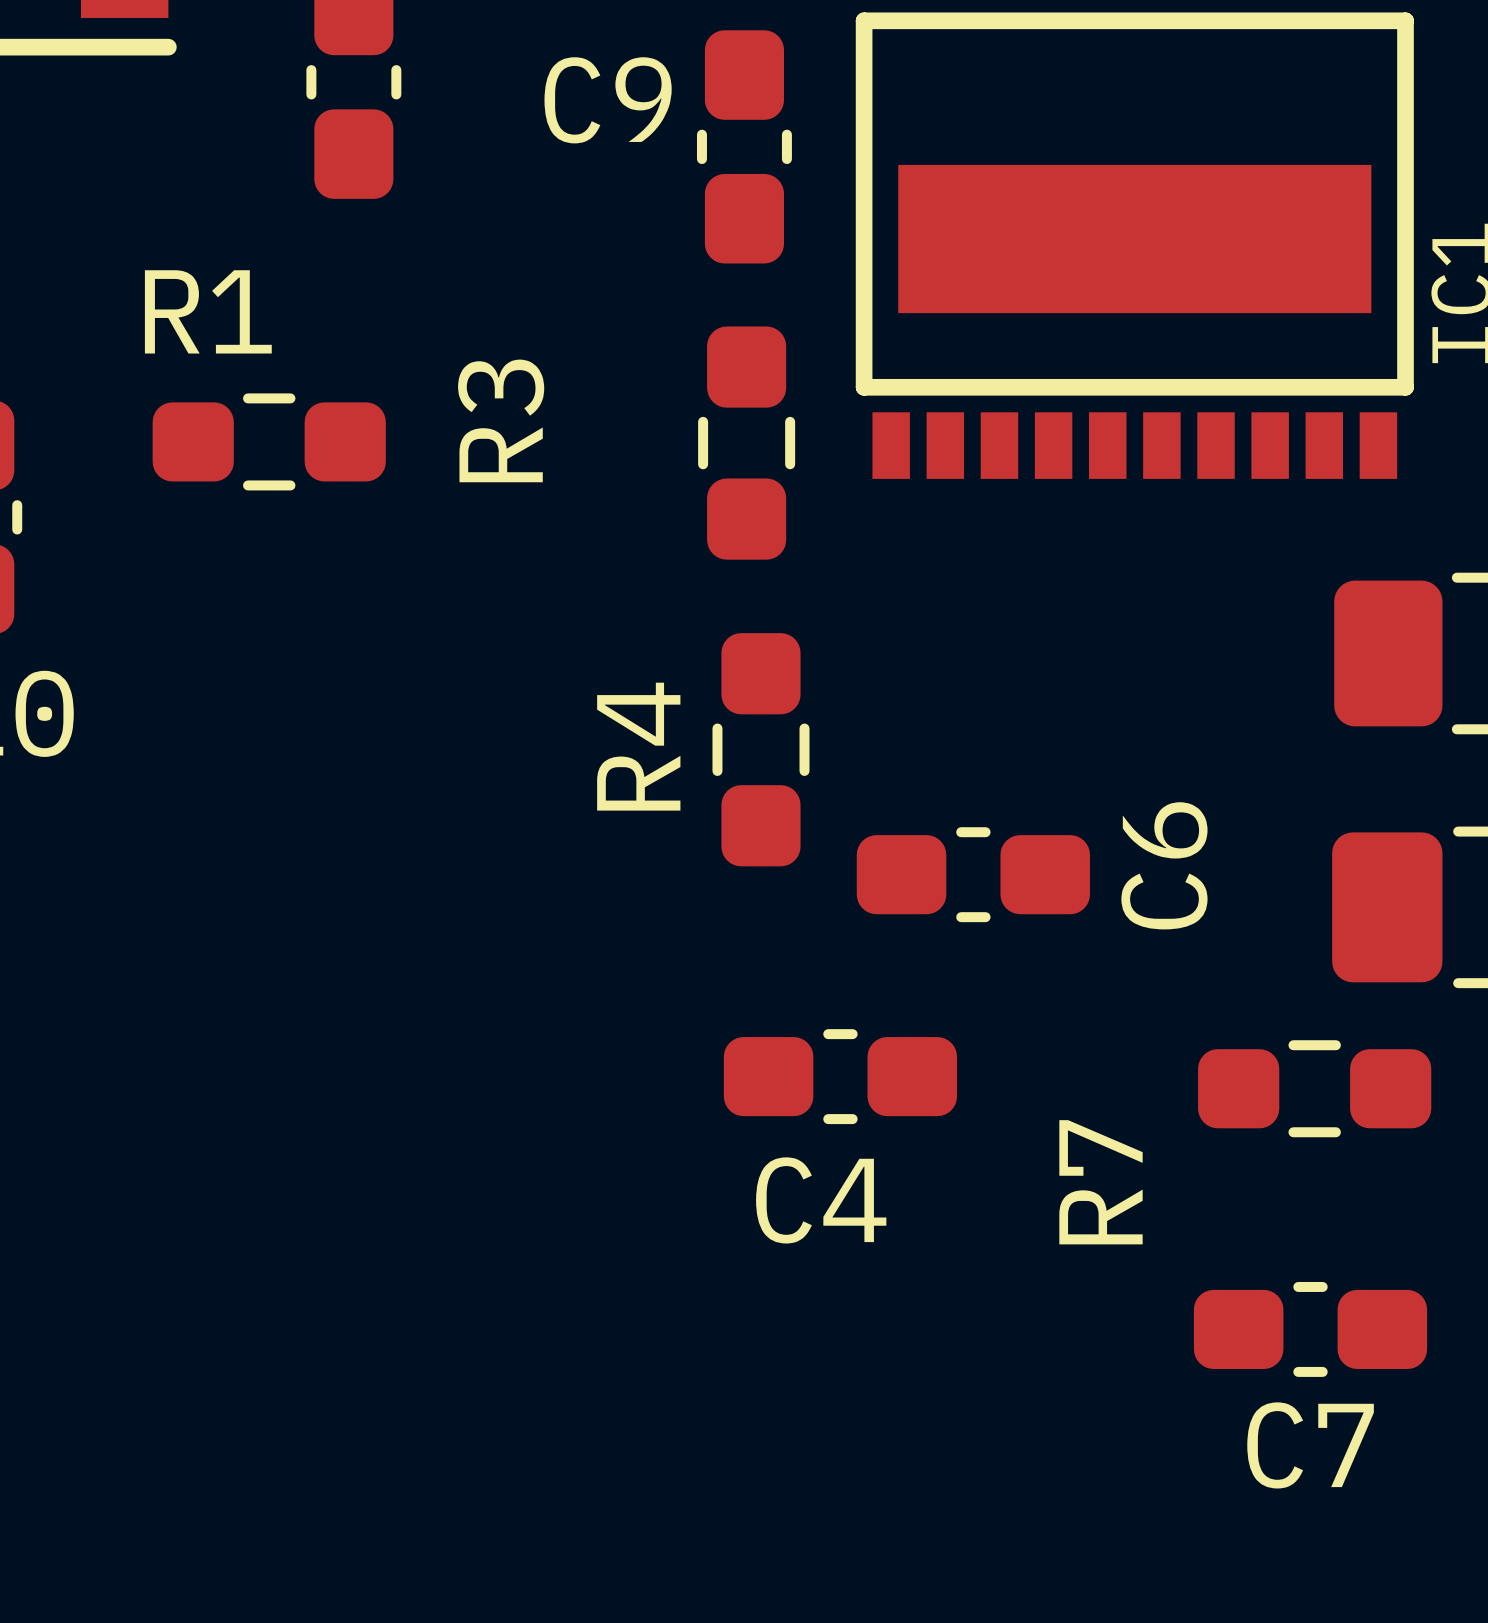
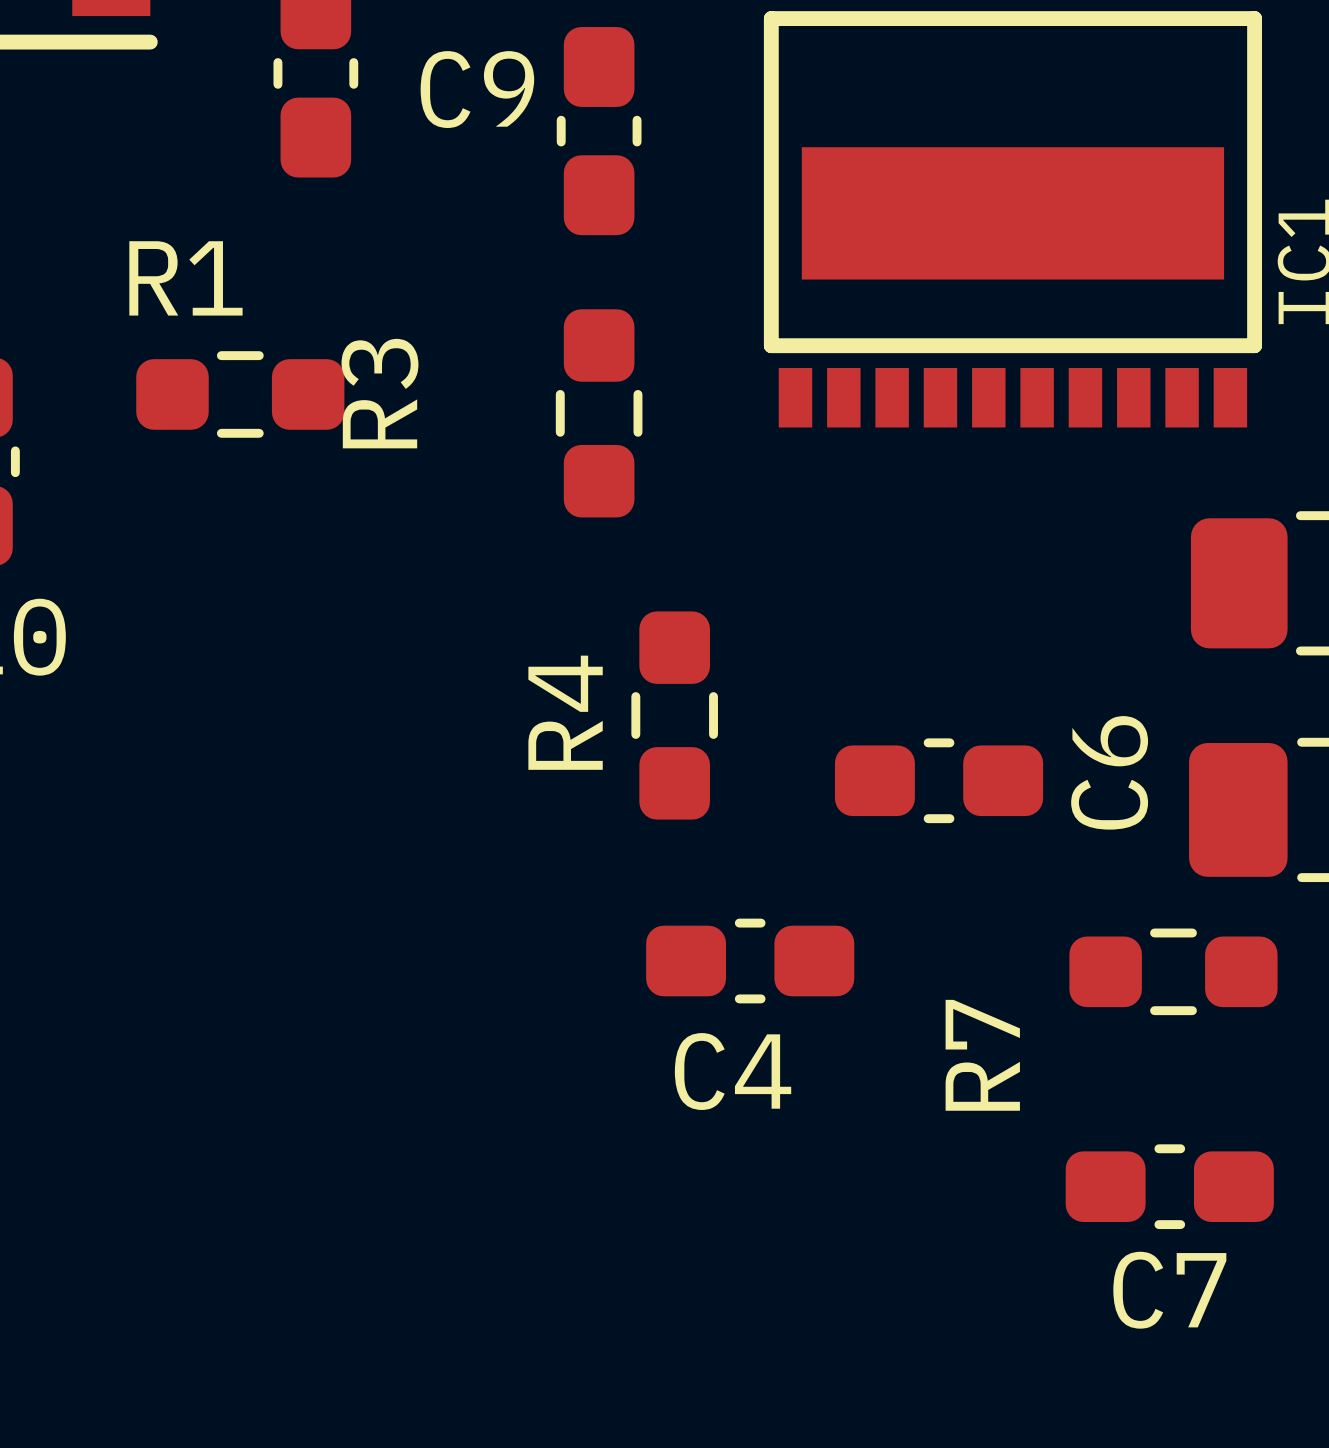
C9 position: (744, 146) -> (599, 131)
R3 position: (746, 443) -> (599, 413)
R4 position: (760, 749) -> (674, 715)
C6 position: (973, 874) -> (939, 780)

